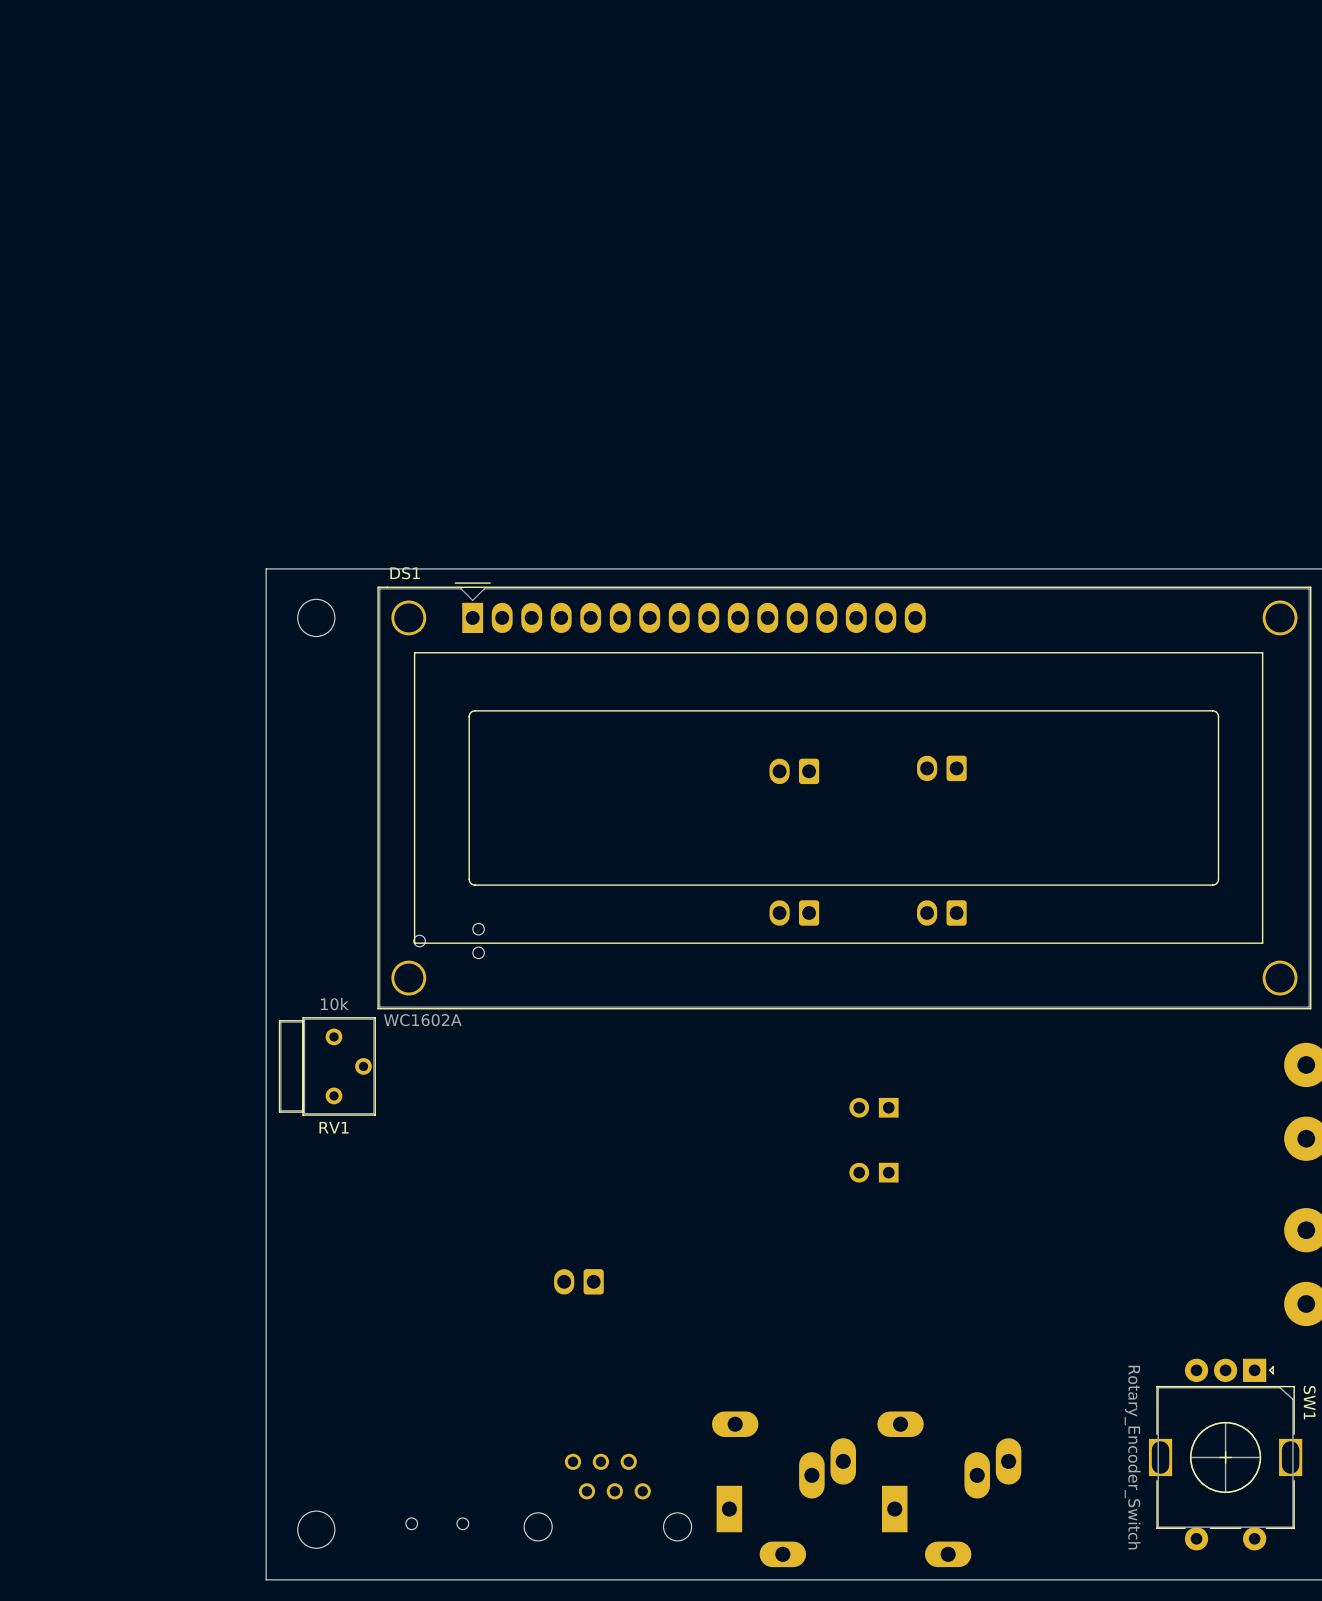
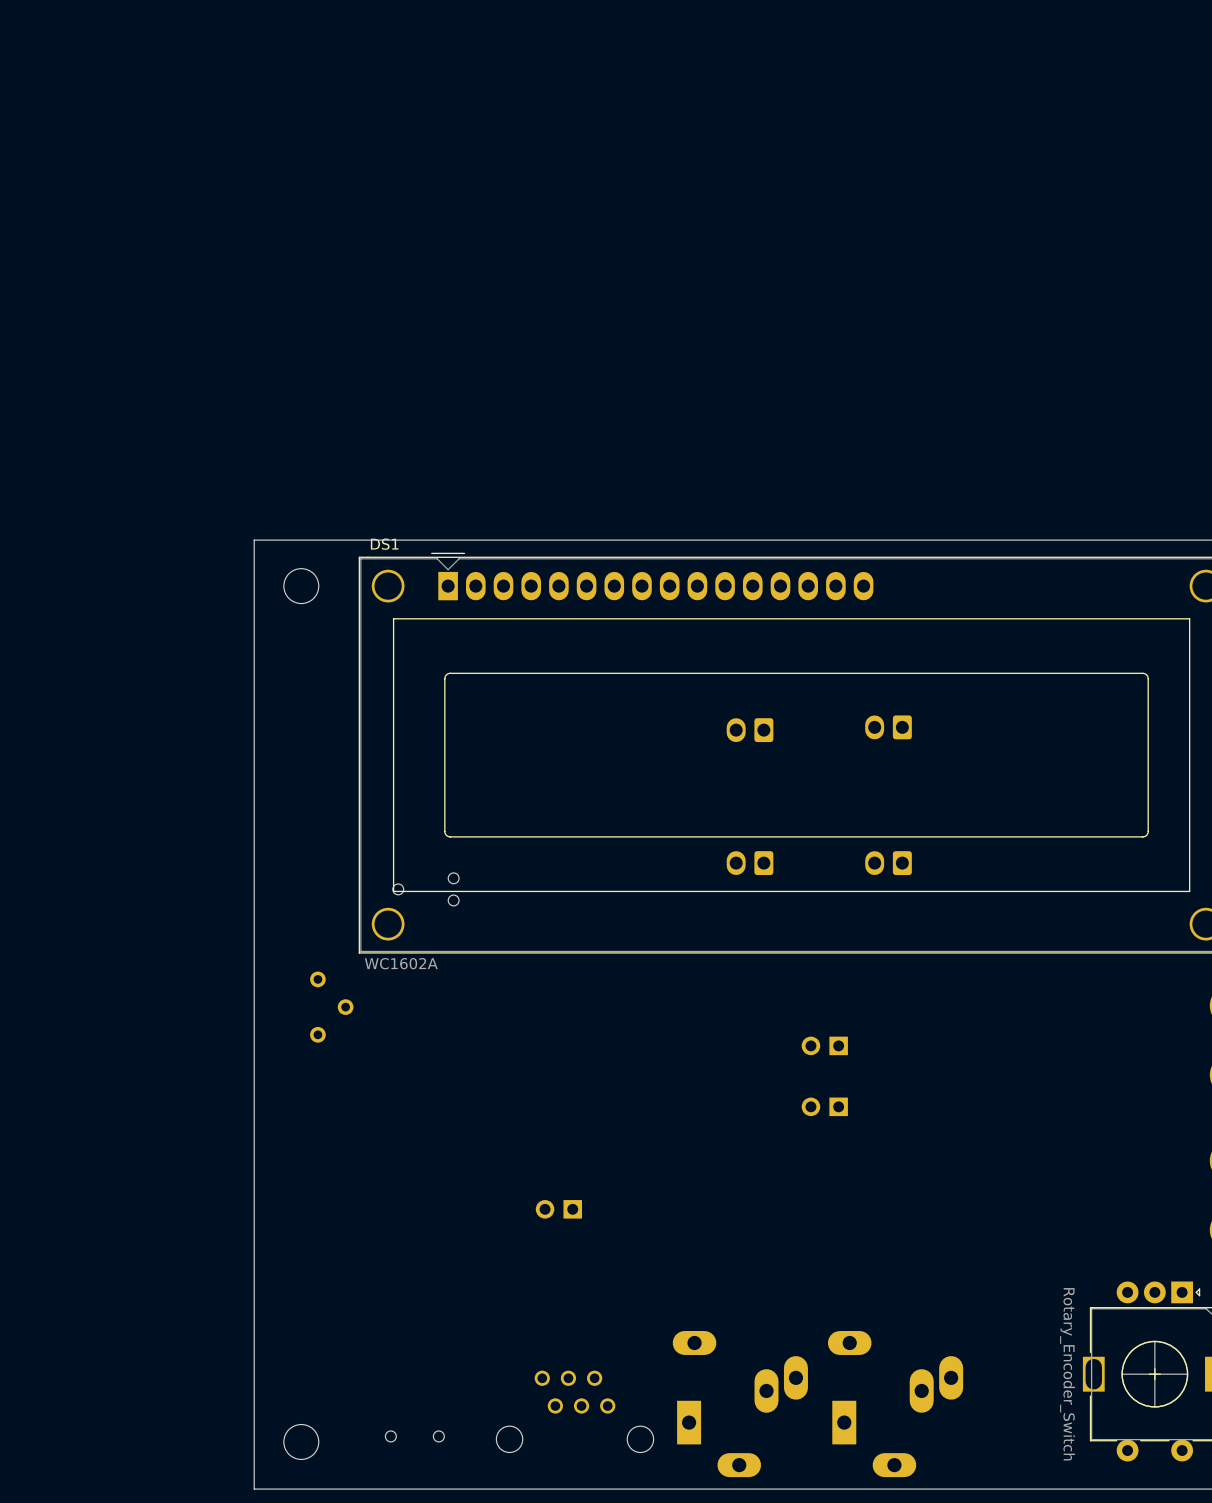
RV1 side: bottom (327, 1066) -> top (331, 1007)
part: (578, 1281) -> none
part: none -> (558, 1209)

